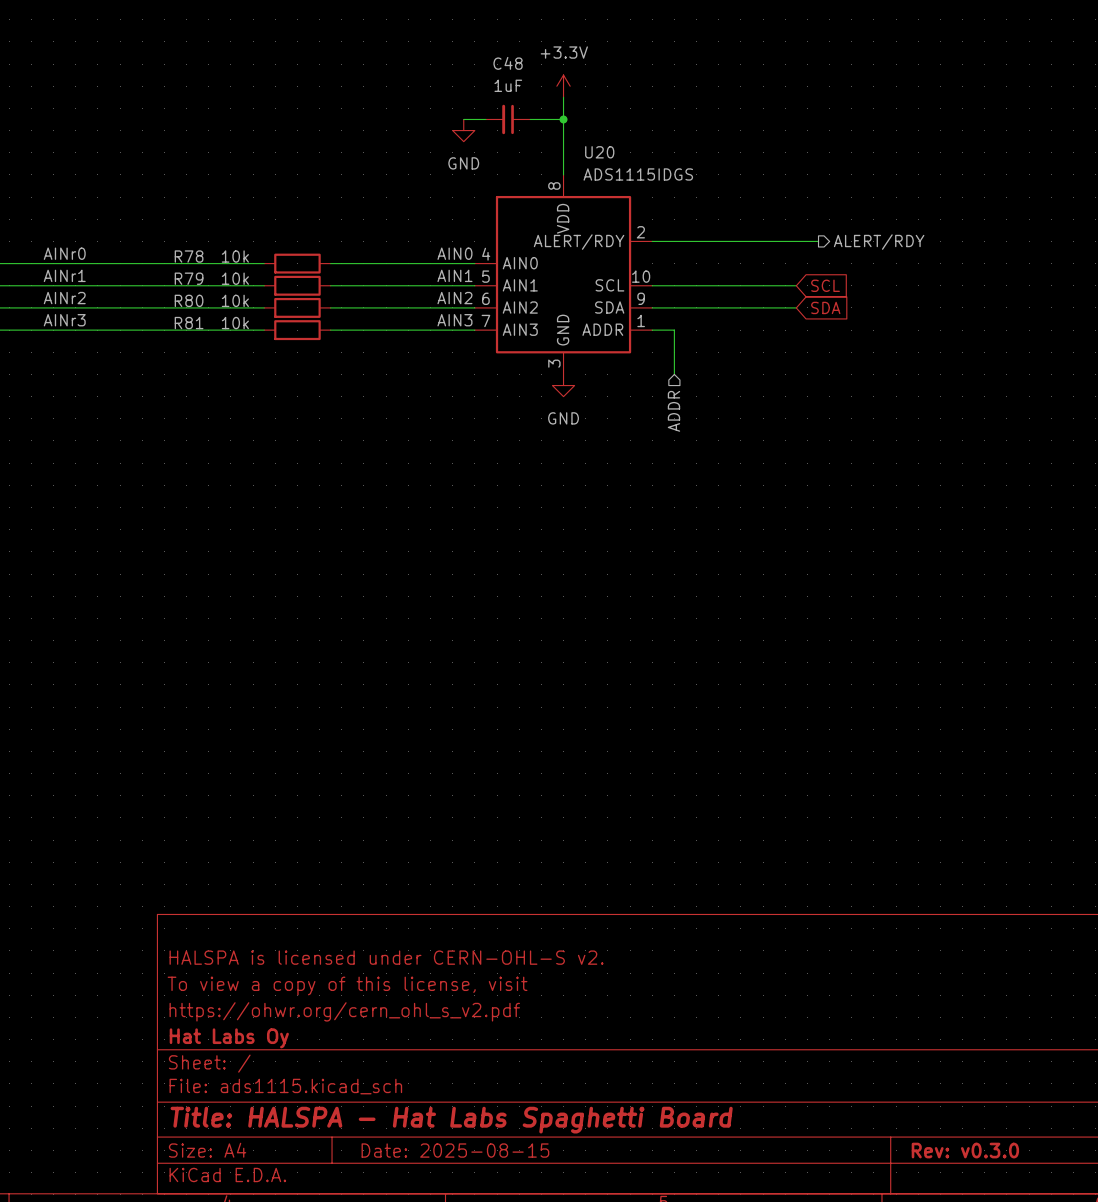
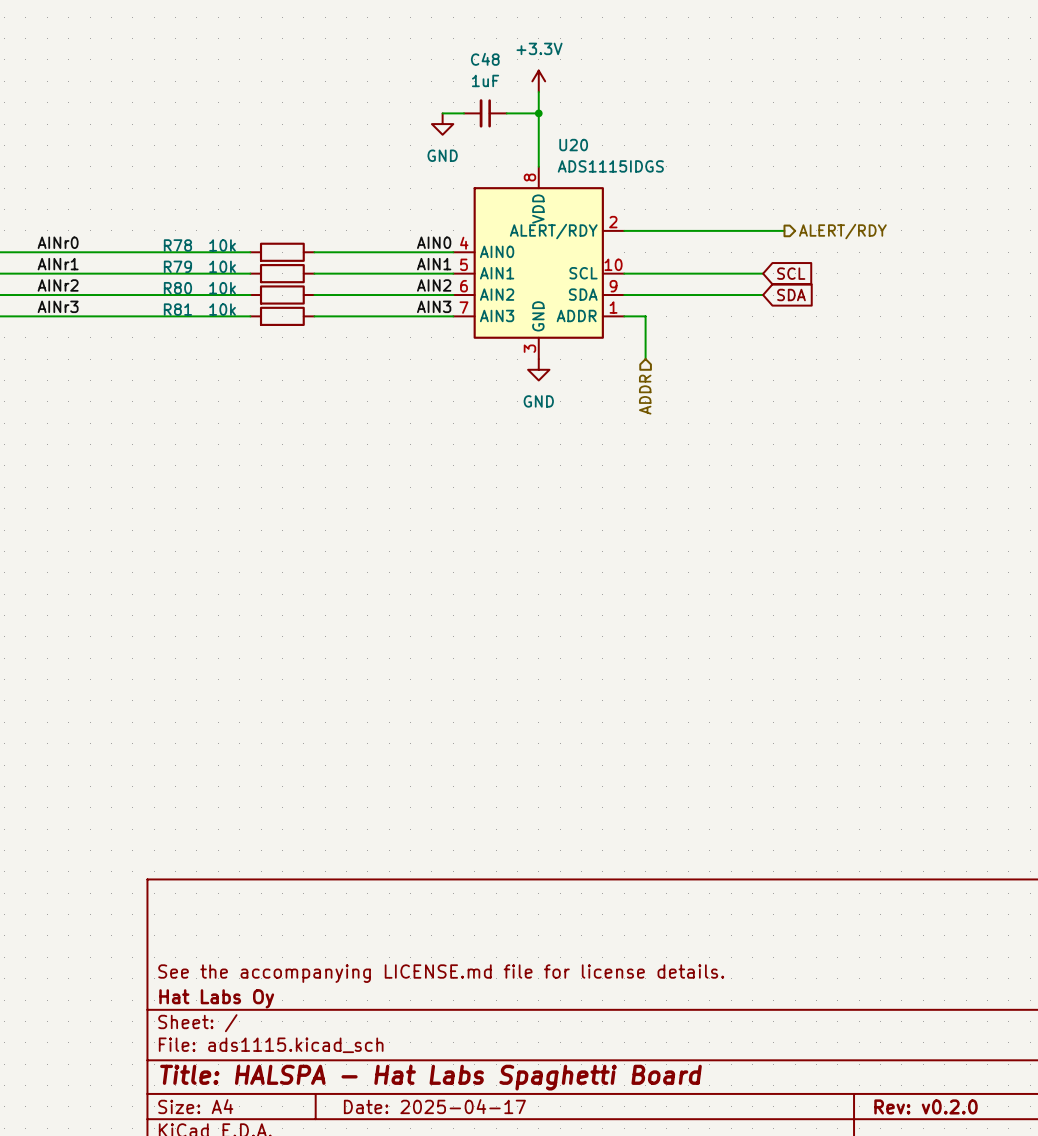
title block: HALSPA is licensed under CERN-OHL-S v2. (386, 957) -> none
title block: To view a copy of this license, visit (347, 985) -> none
title block: https://ohwr.org/cern_ohl_s_v2.pdf (344, 1011) -> See the accompanying LICENSE.md file for license details. (441, 973)
title block: Date: 2025-08-15 (455, 1150) -> Date: 2025-04-17 (434, 1106)
title block: Rev: v0.3.0 (965, 1150) -> Rev: v0.2.0 (926, 1106)

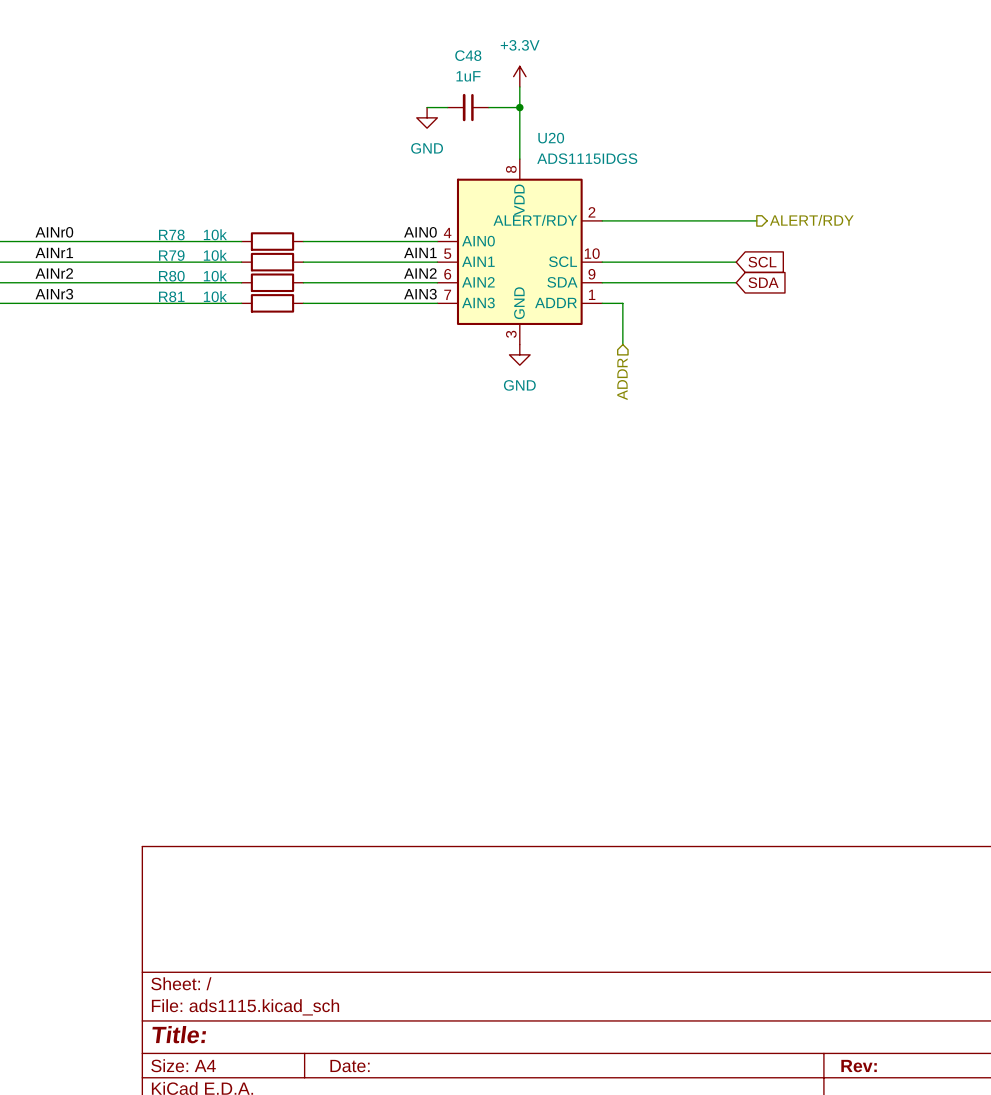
title block: See the accompanying LICENSE.md file for license details. (441, 973) -> none
title block: Hat Labs Oy (216, 998) -> none
title block: Title: HALSPA - Hat Labs Spaghetti Board (430, 1077) -> Title: (179, 1034)
title block: Date: 2025-04-17 (434, 1106) -> Date: (350, 1066)
title block: Rev: v0.2.0 (926, 1106) -> Rev: (859, 1066)

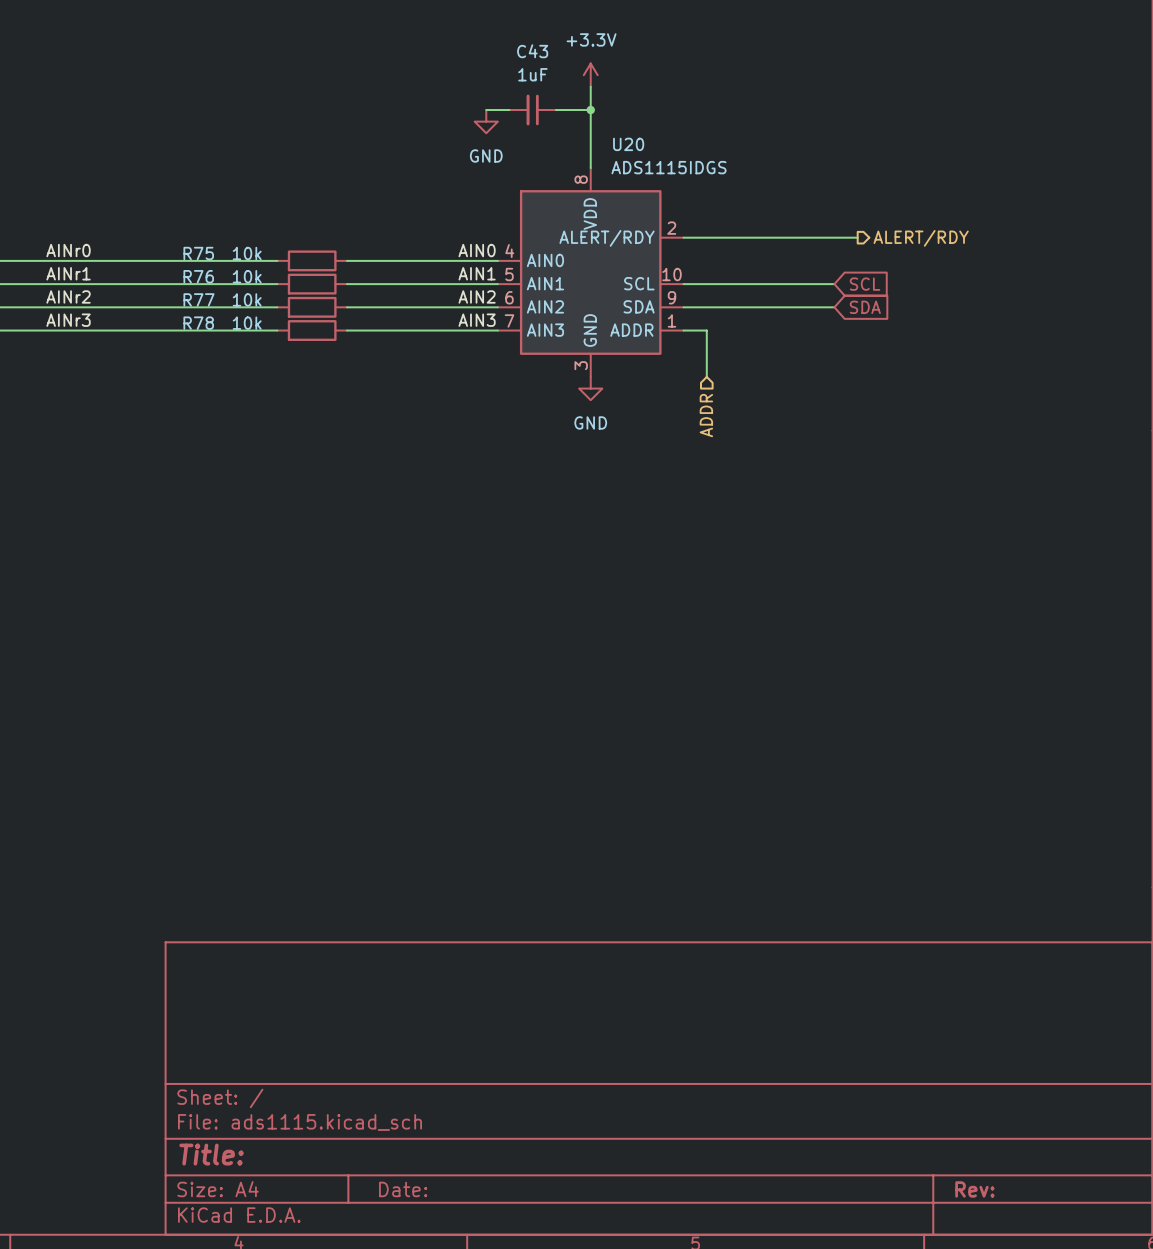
C48 name: C48 (468, 55) -> C43 (532, 51)
R78 name: R78 (171, 234) -> R75 (198, 253)
R79 name: R79 (171, 255) -> R76 (198, 276)
R80 name: R80 (171, 276) -> R77 (198, 299)
R81 name: R81 (171, 296) -> R78 (198, 323)

